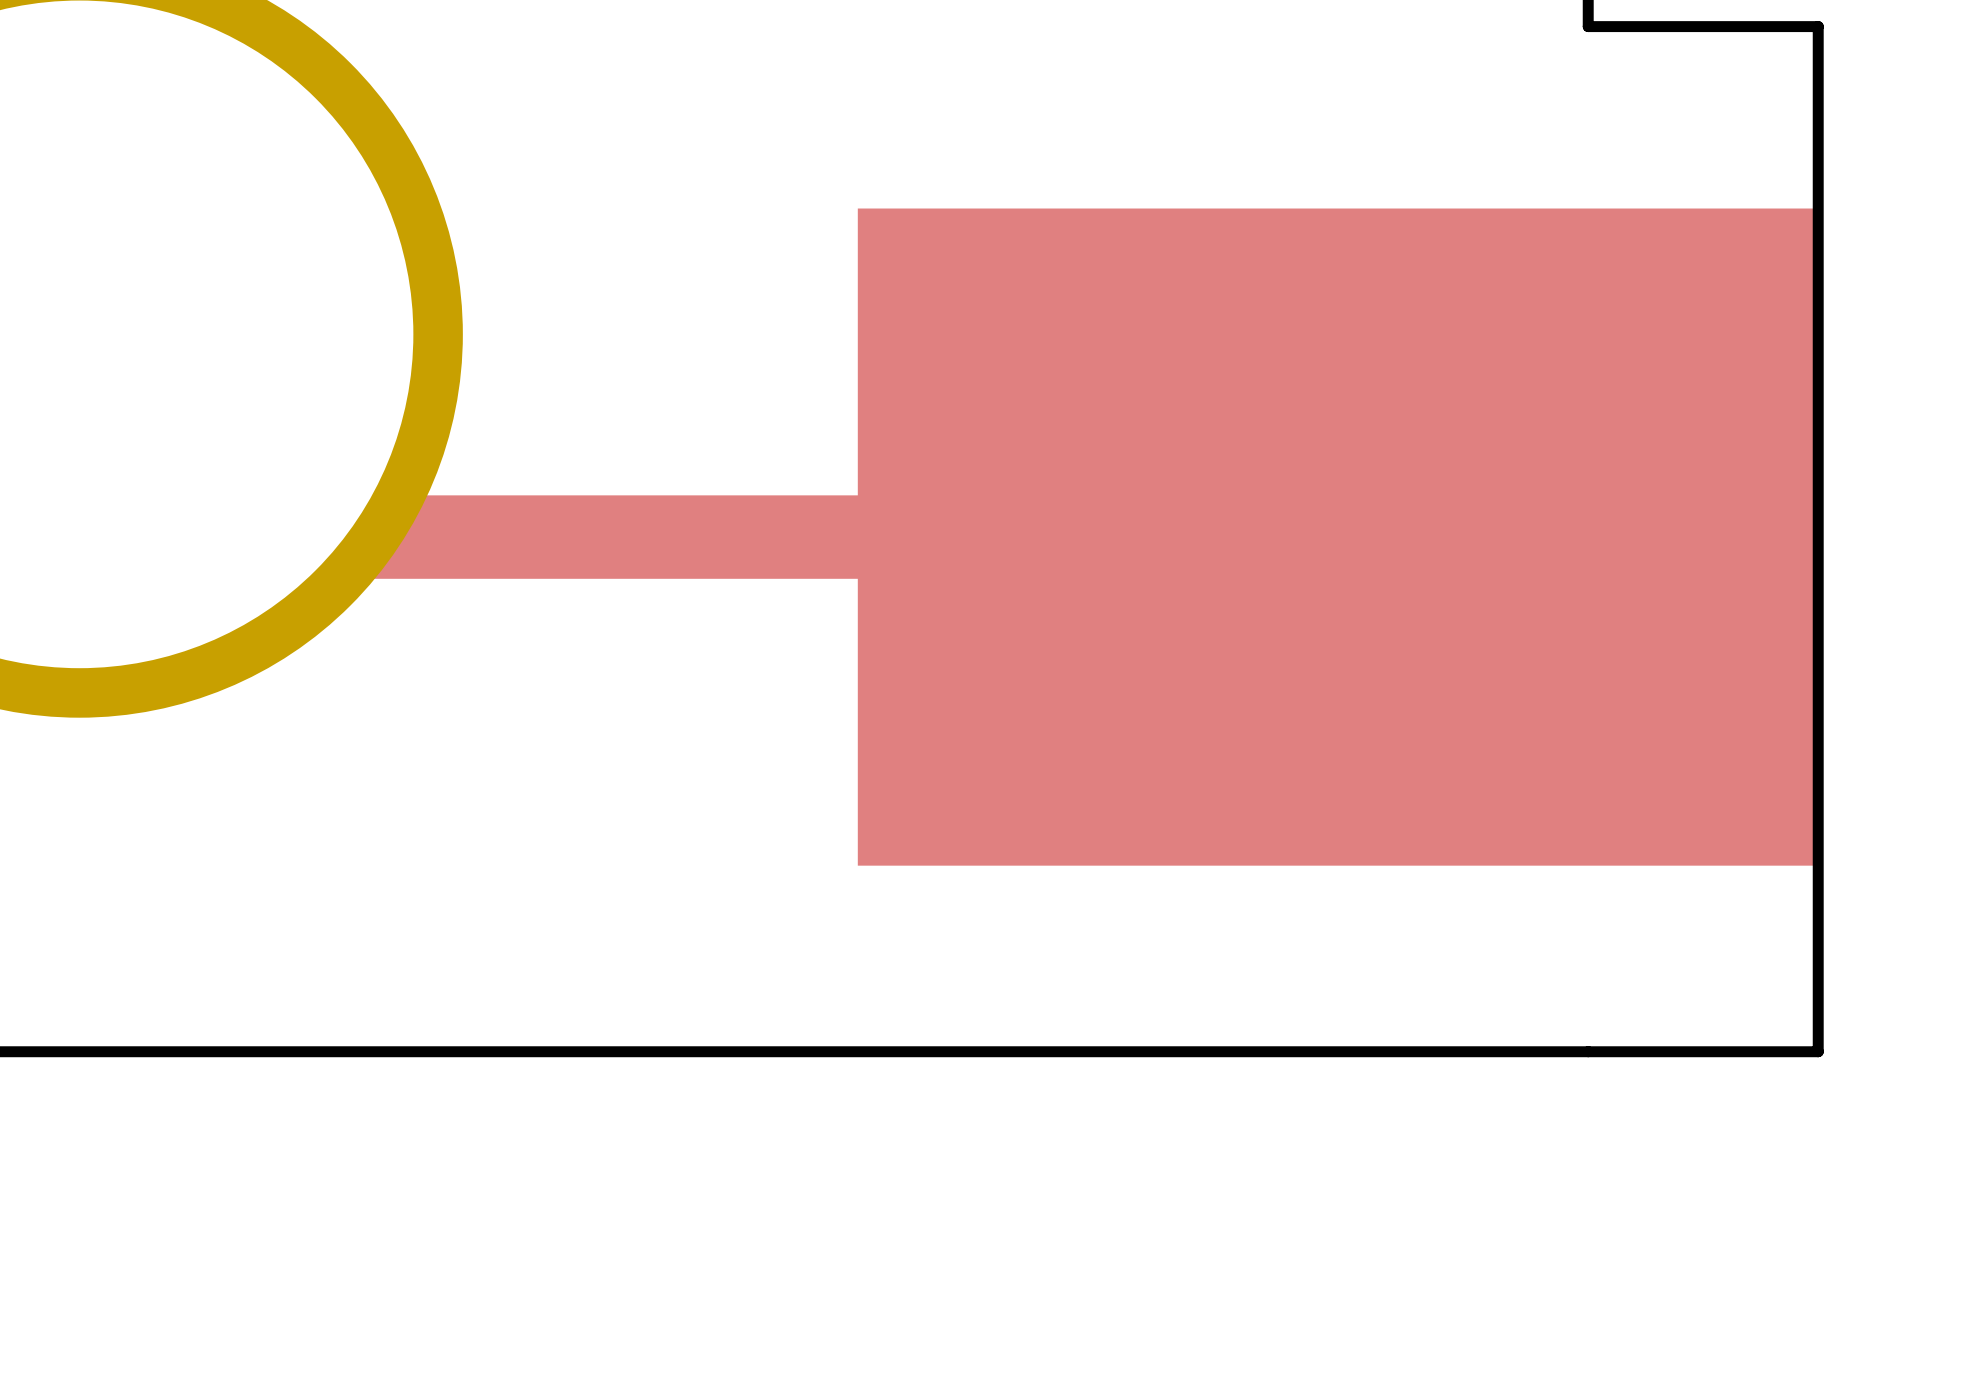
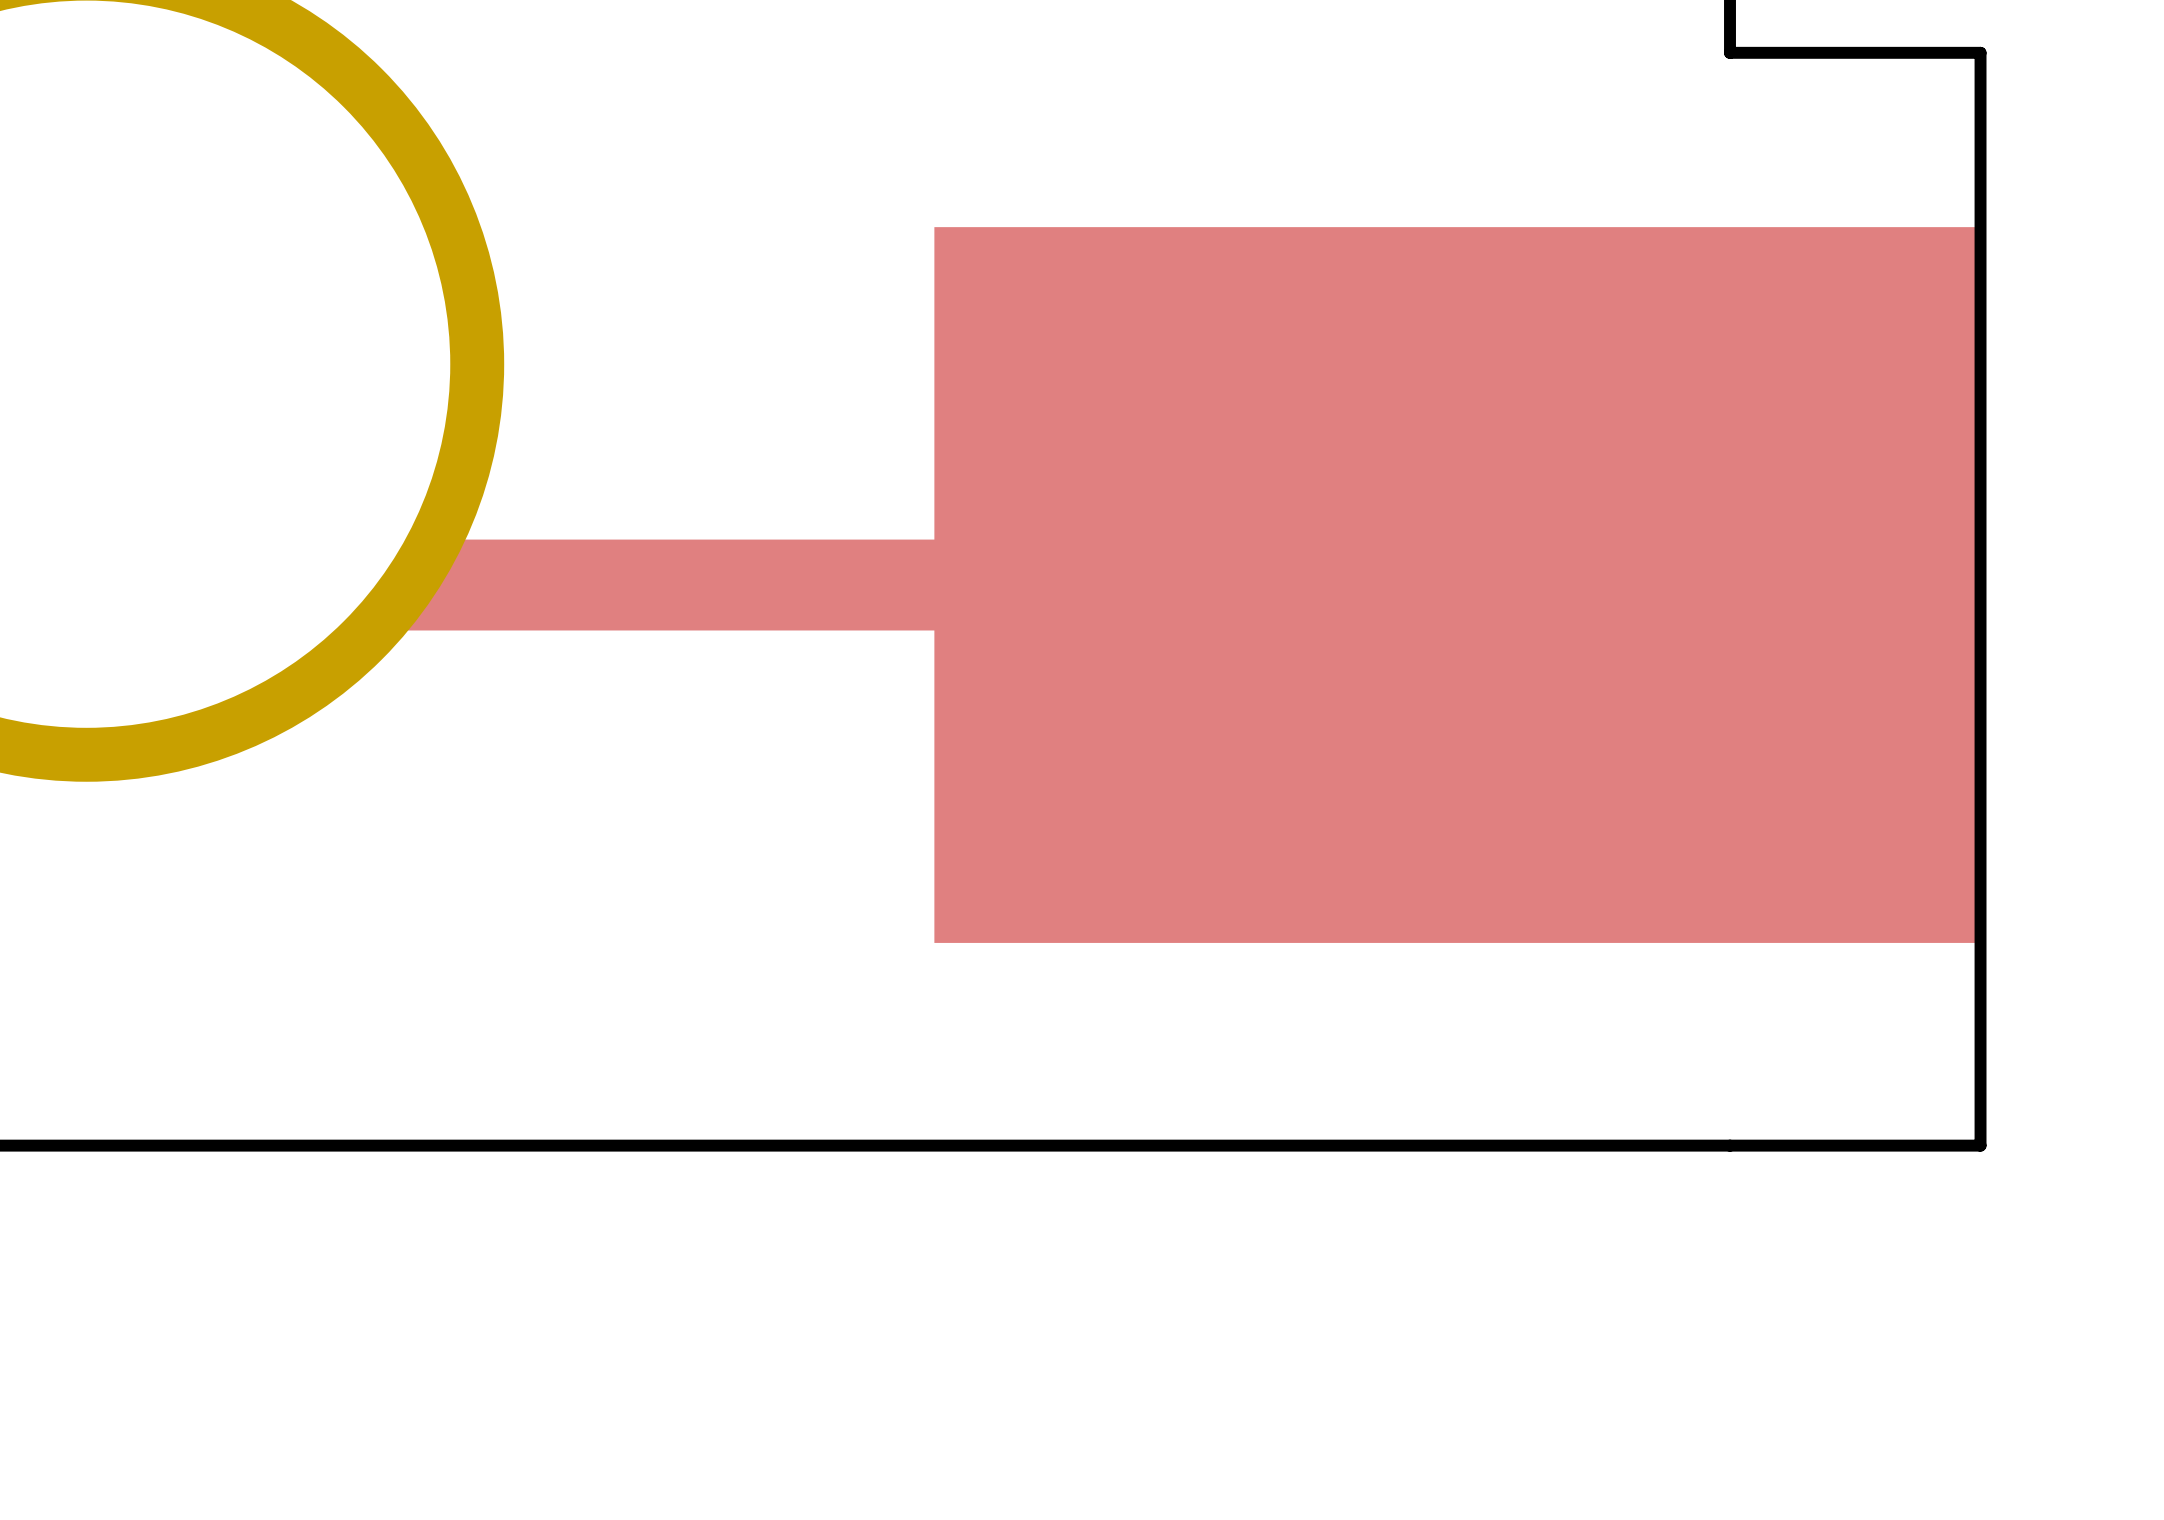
board edge: (1588, 26) (1818, 26) (1818, 48) -> (1730, 28) (1730, 52) (1980, 52)

